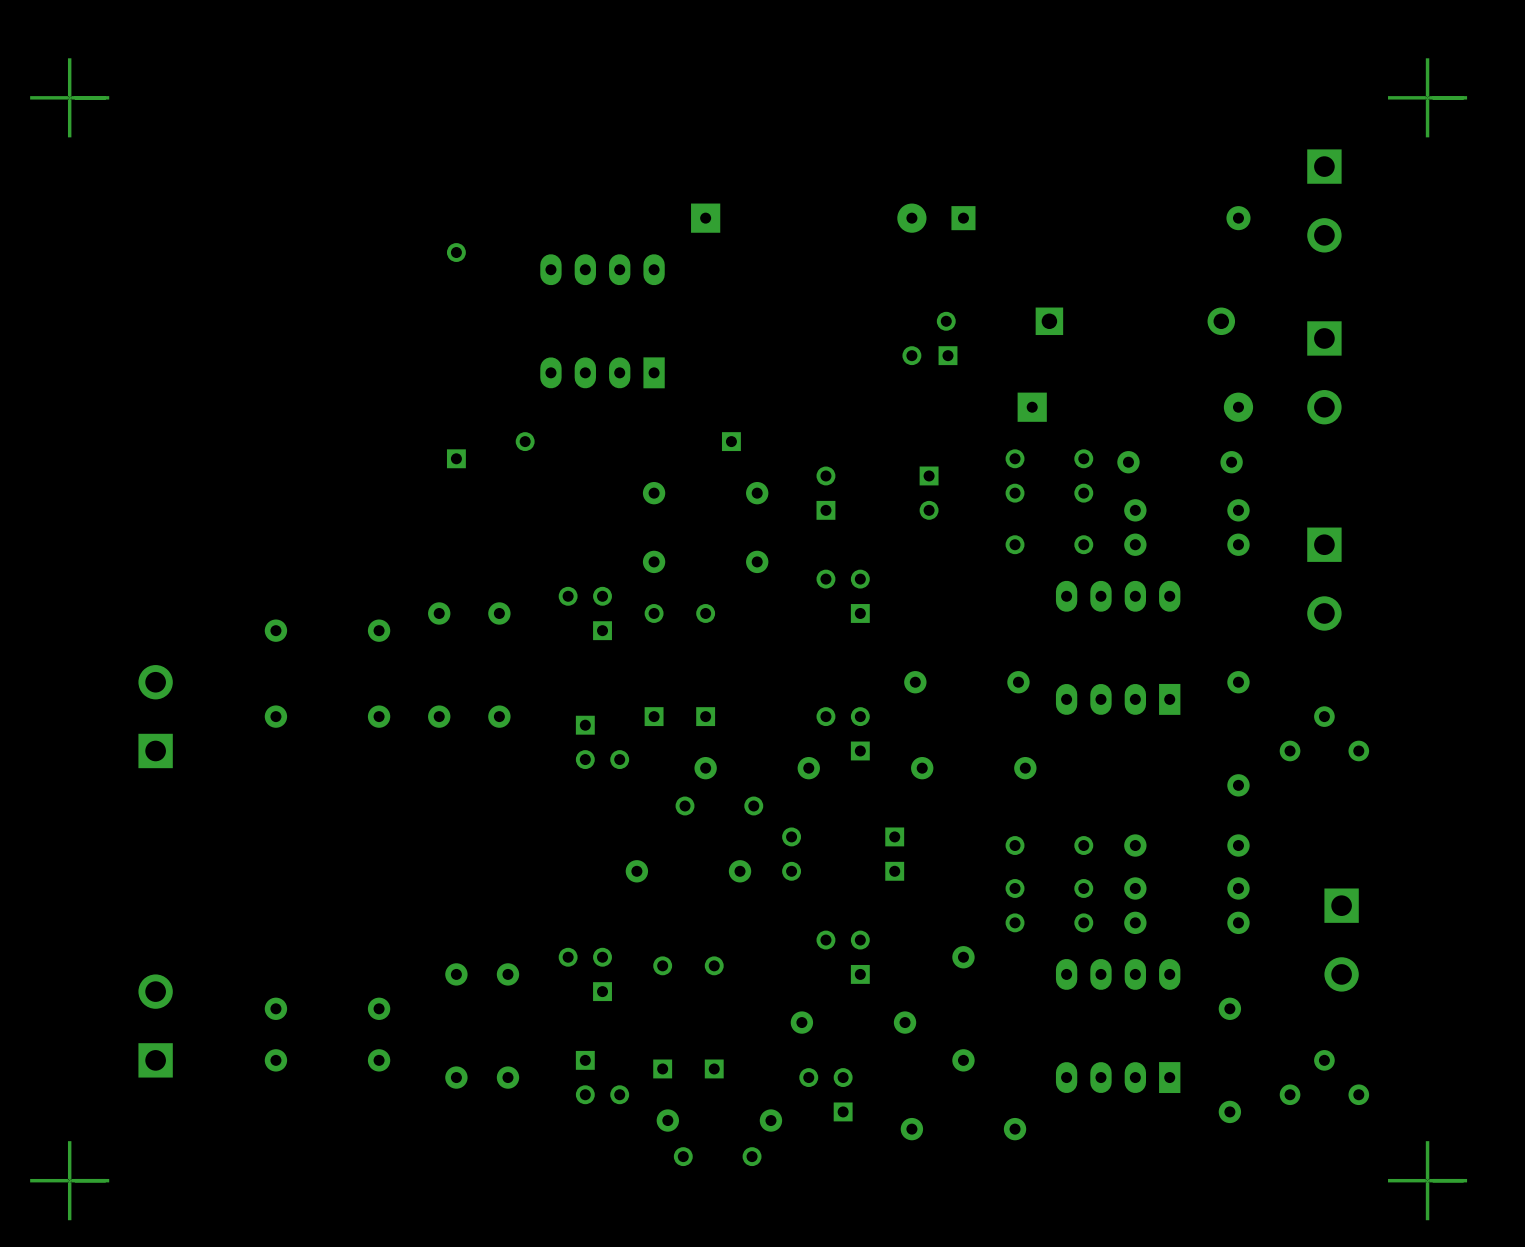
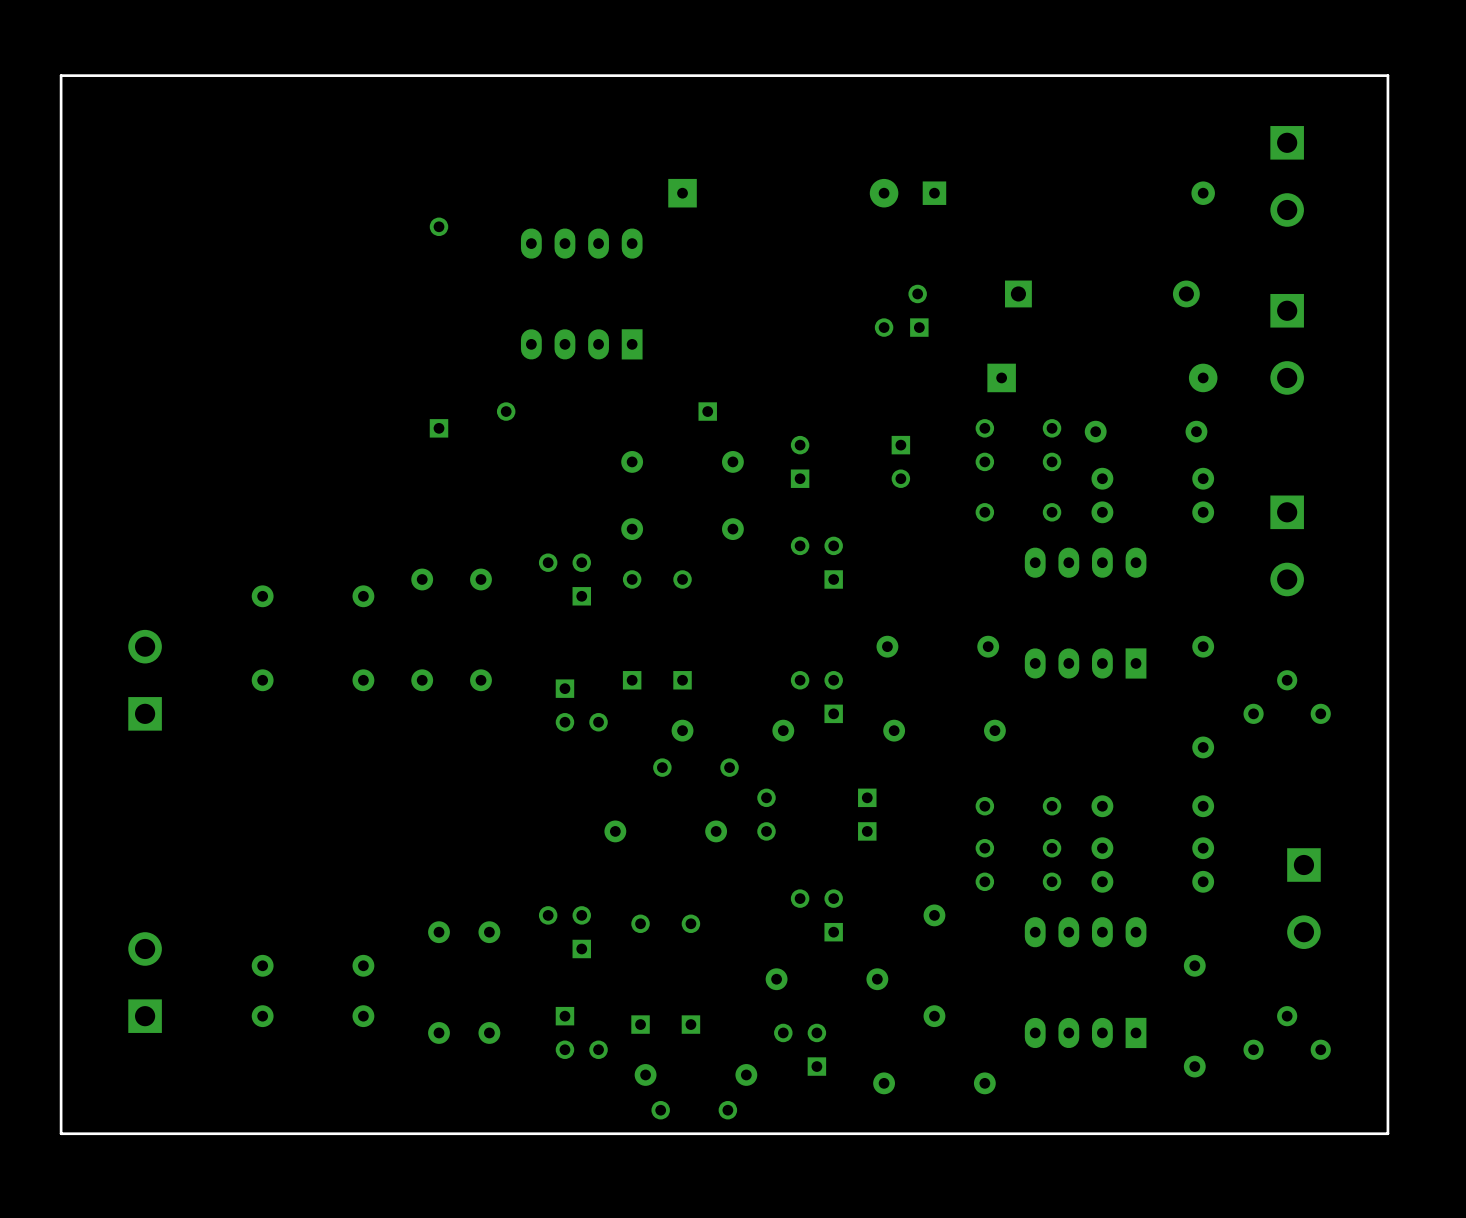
part: (69, 97) -> none
board edge: none -> (1387, 75) (1387, 1133) (61, 1133) (61, 75) (1387, 75)
part: (1427, 97) -> none
part: (69, 1180) -> none
part: (1427, 1180) -> none

